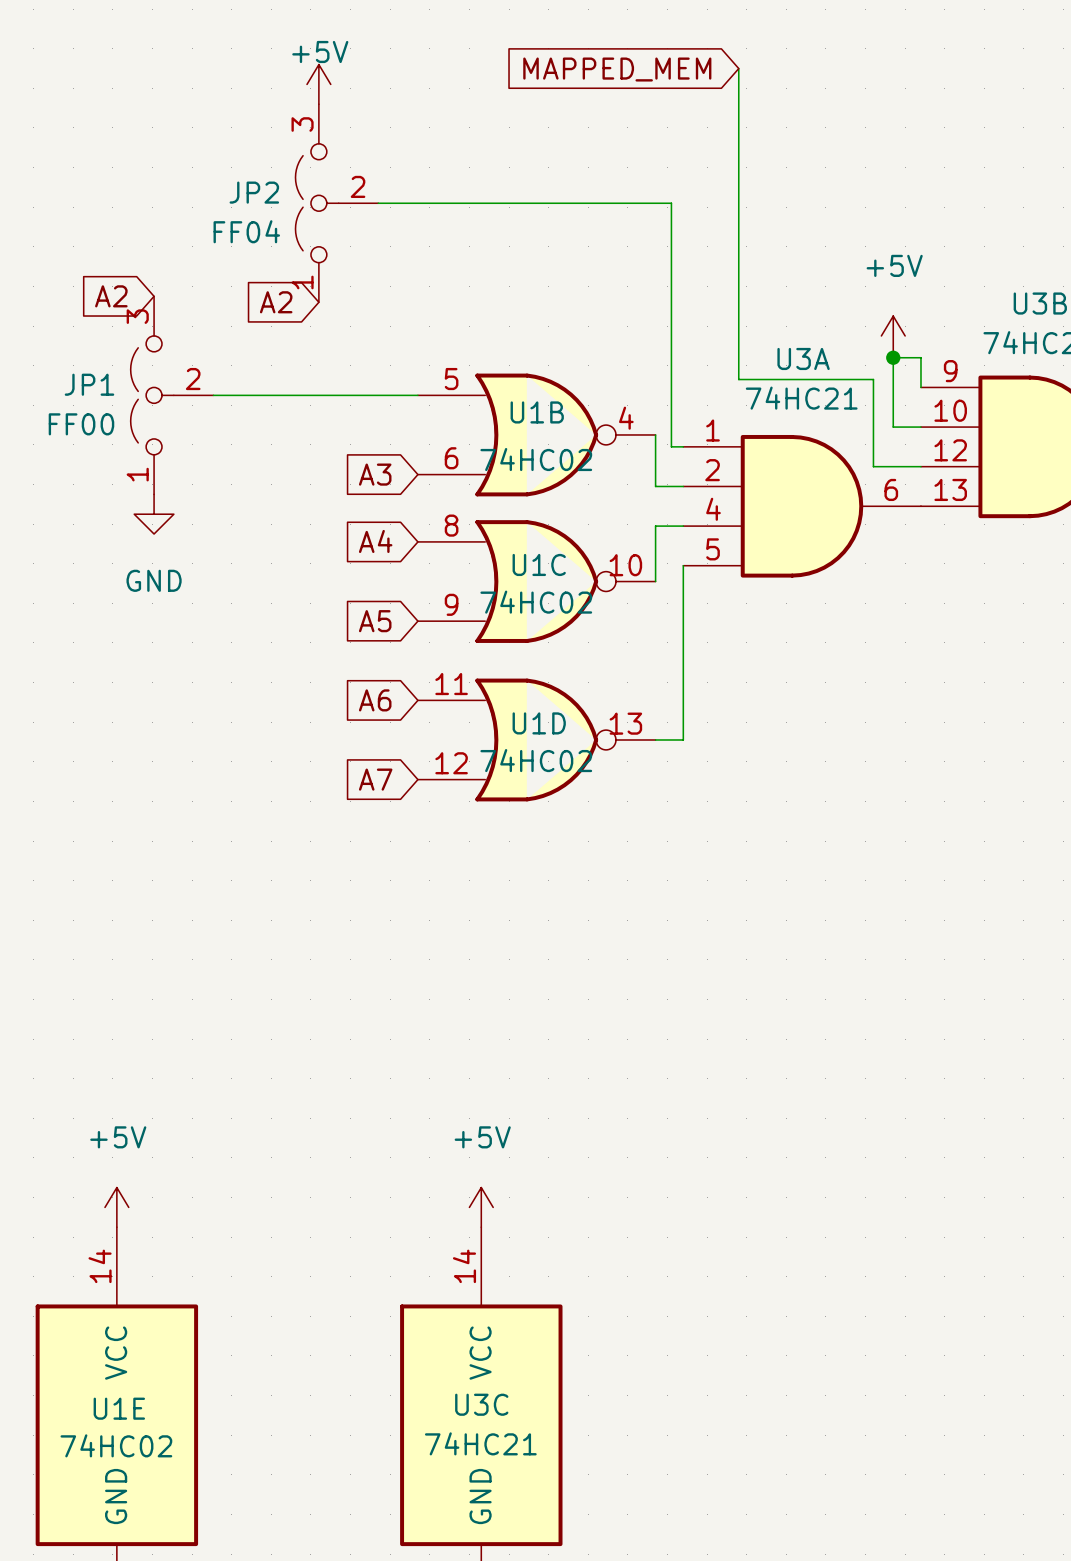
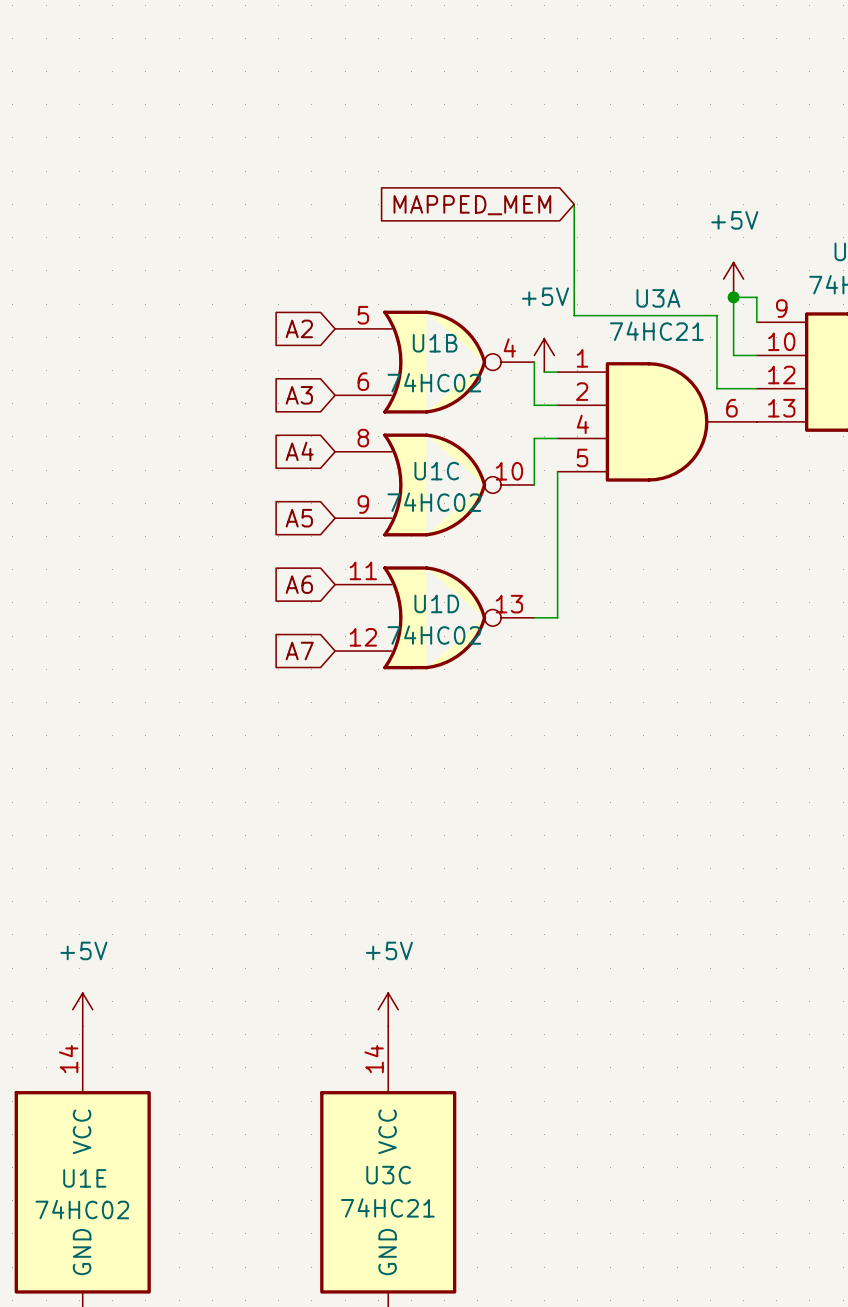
wire: (738, 68) (738, 379) -> (574, 204) (574, 315) (604, 315)
global label position: MAPPED_MEM (617, 69) -> MAPPED_MEM (472, 205)
power symbol: +5V (318, 84) -> none
JP2: FF04 (336, 203) -> none
wire: (378, 203) (671, 203) (671, 446) -> (544, 372) (547, 372)
global label: A2 (111, 296) -> none
global label position: A2 (276, 302) -> A2 (299, 328)
JP1: FF00 (172, 395) -> none
wire: (213, 395) (417, 395) -> none
power symbol: none -> +5V (544, 355)
power symbol: GND (154, 514) -> none

